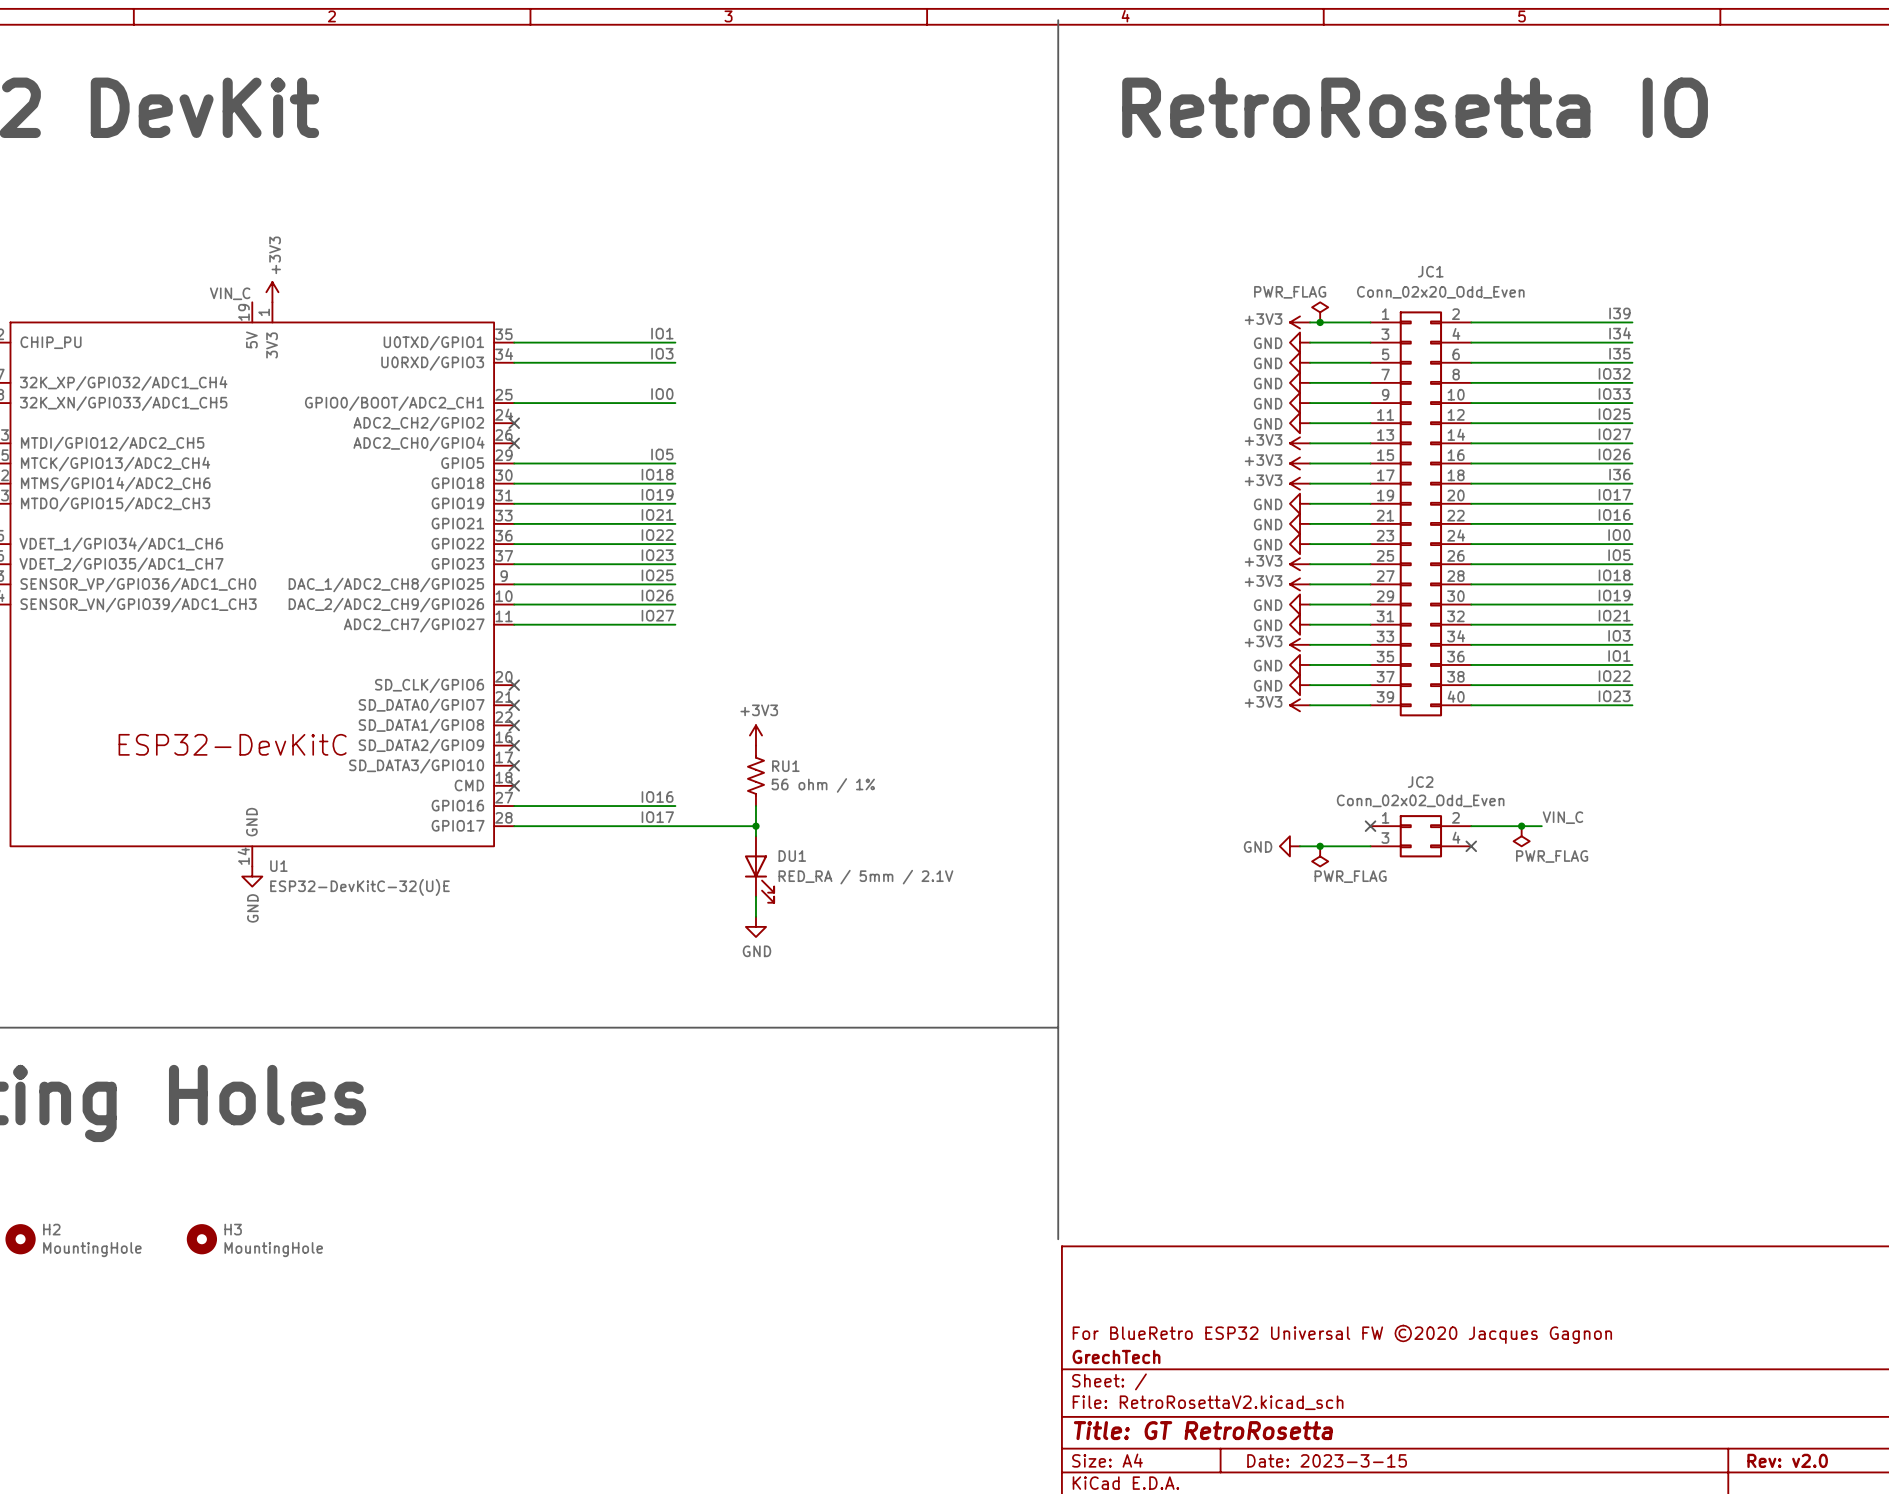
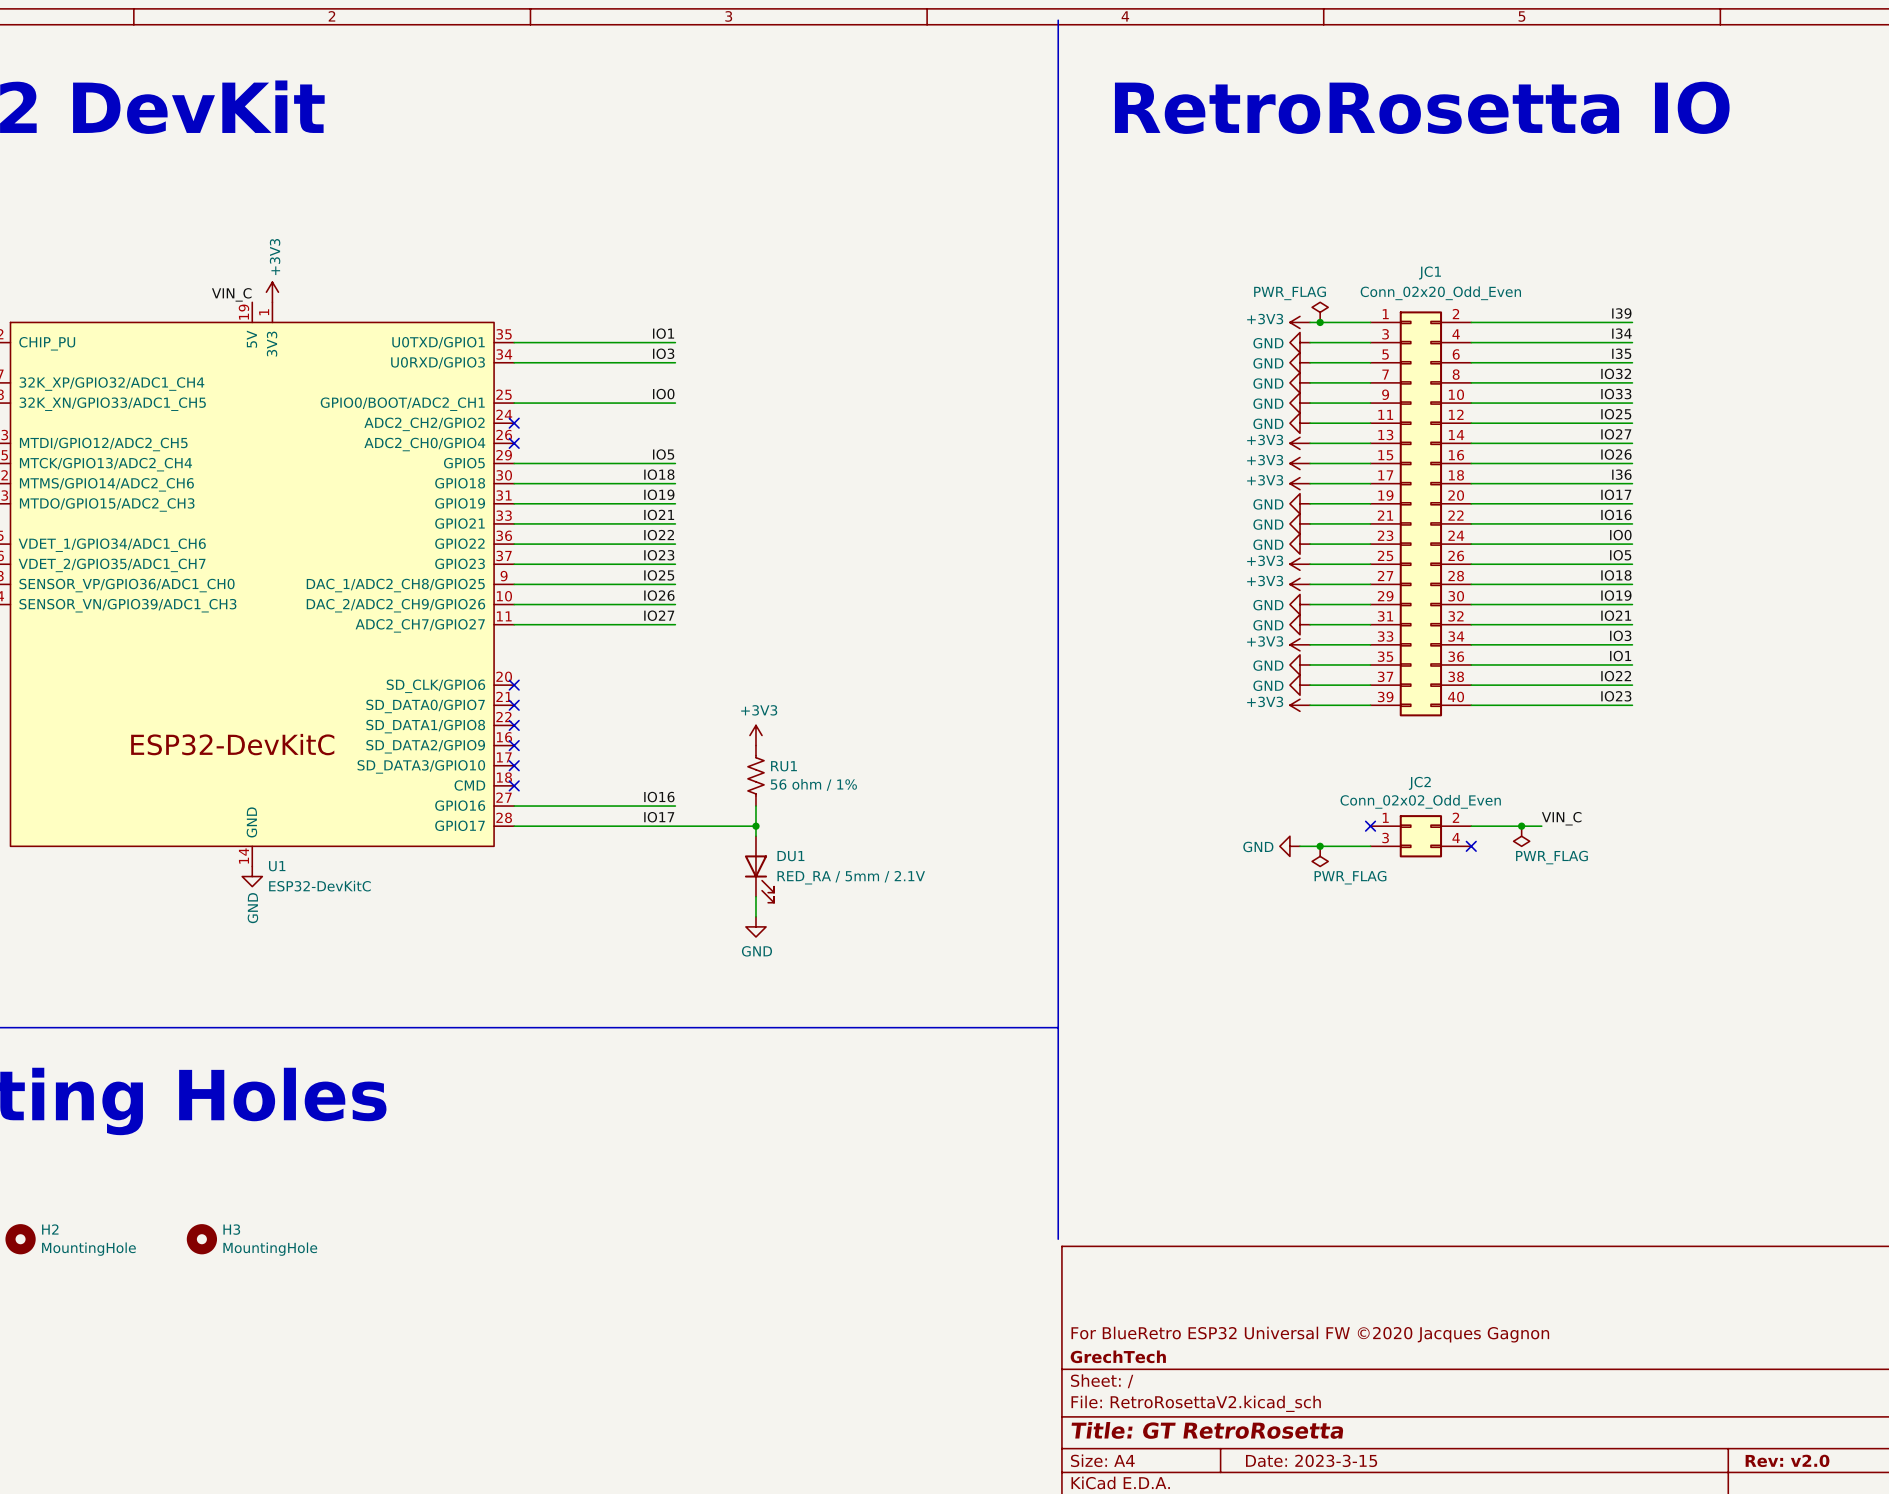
U1 value: ESP32-DevKitC-32(U)E (359, 887) -> ESP32-DevKitC (319, 886)

